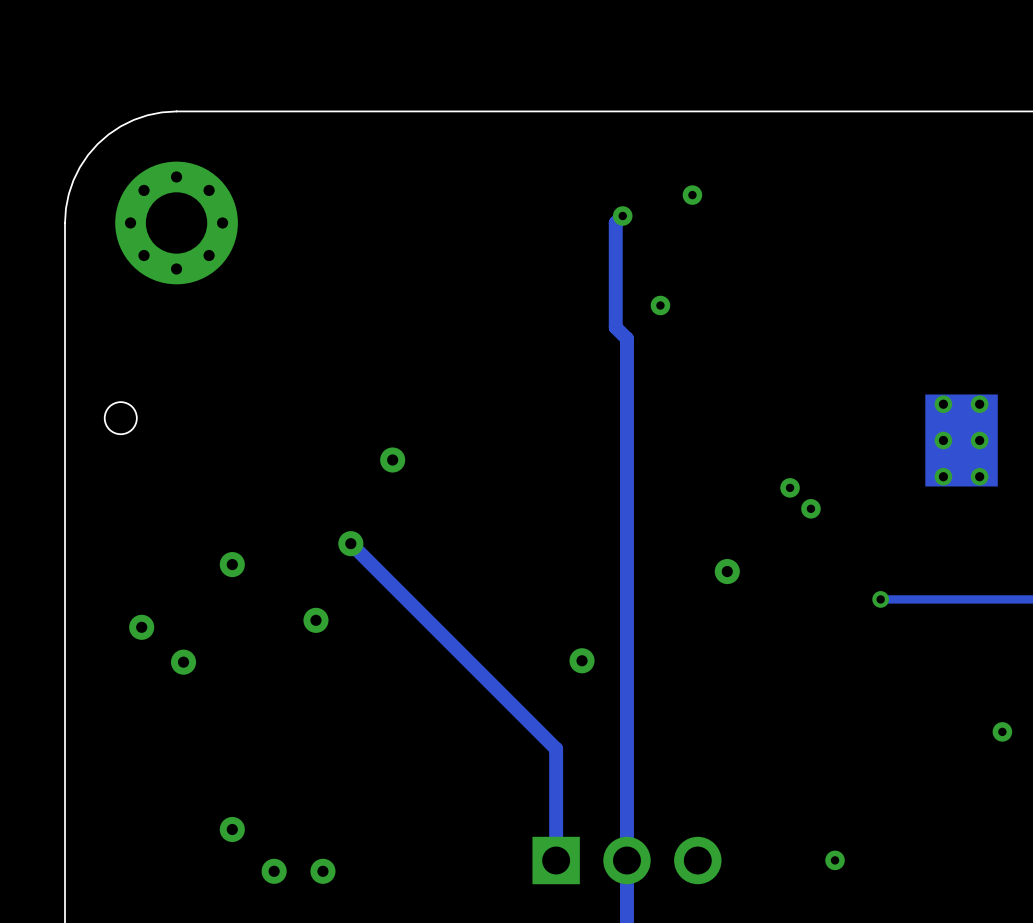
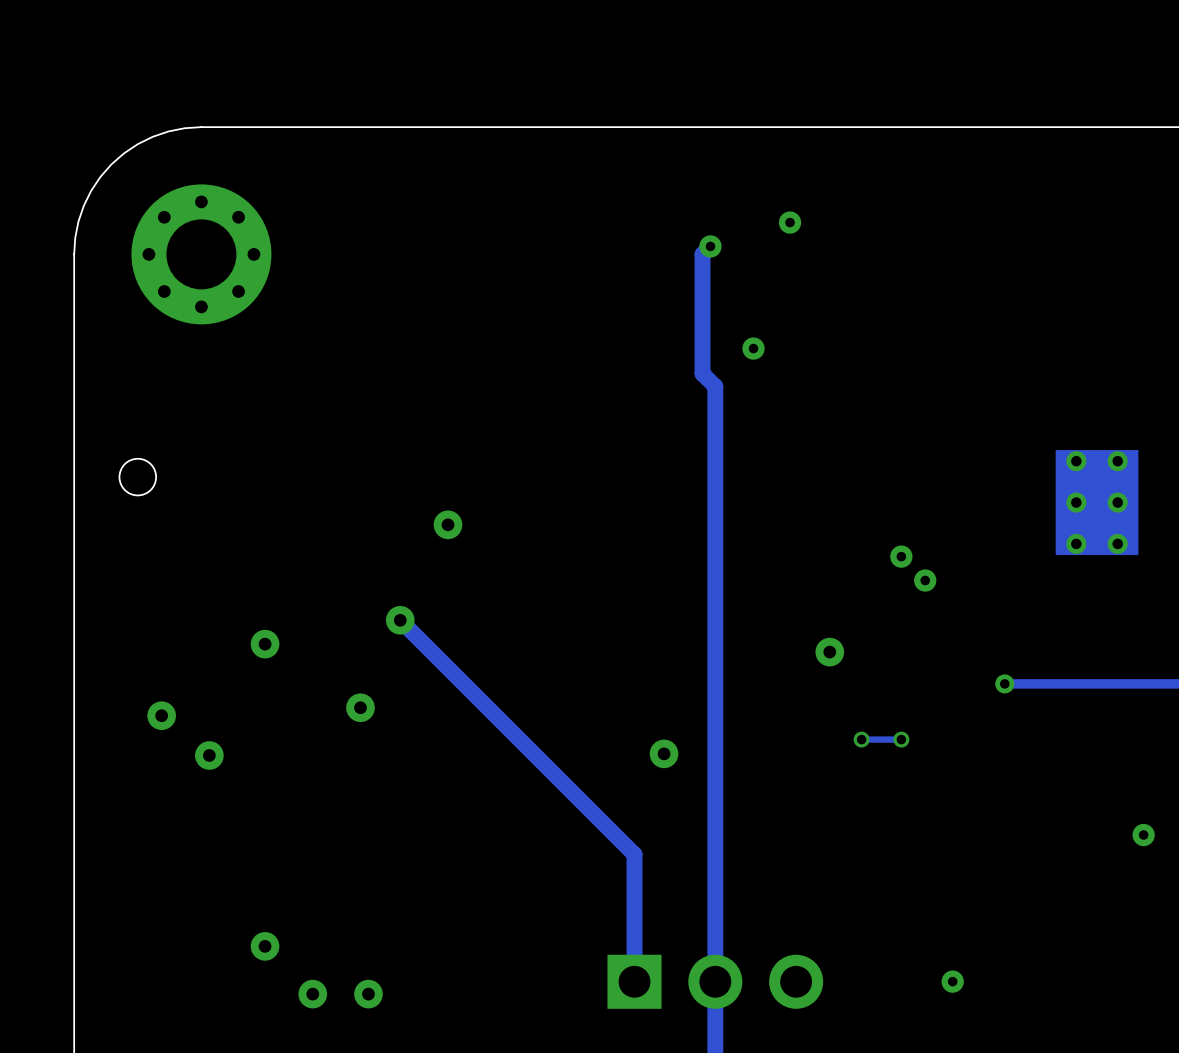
via: none -> (861, 739)
track: none -> (901, 739) (861, 739)
via: none -> (901, 739)

